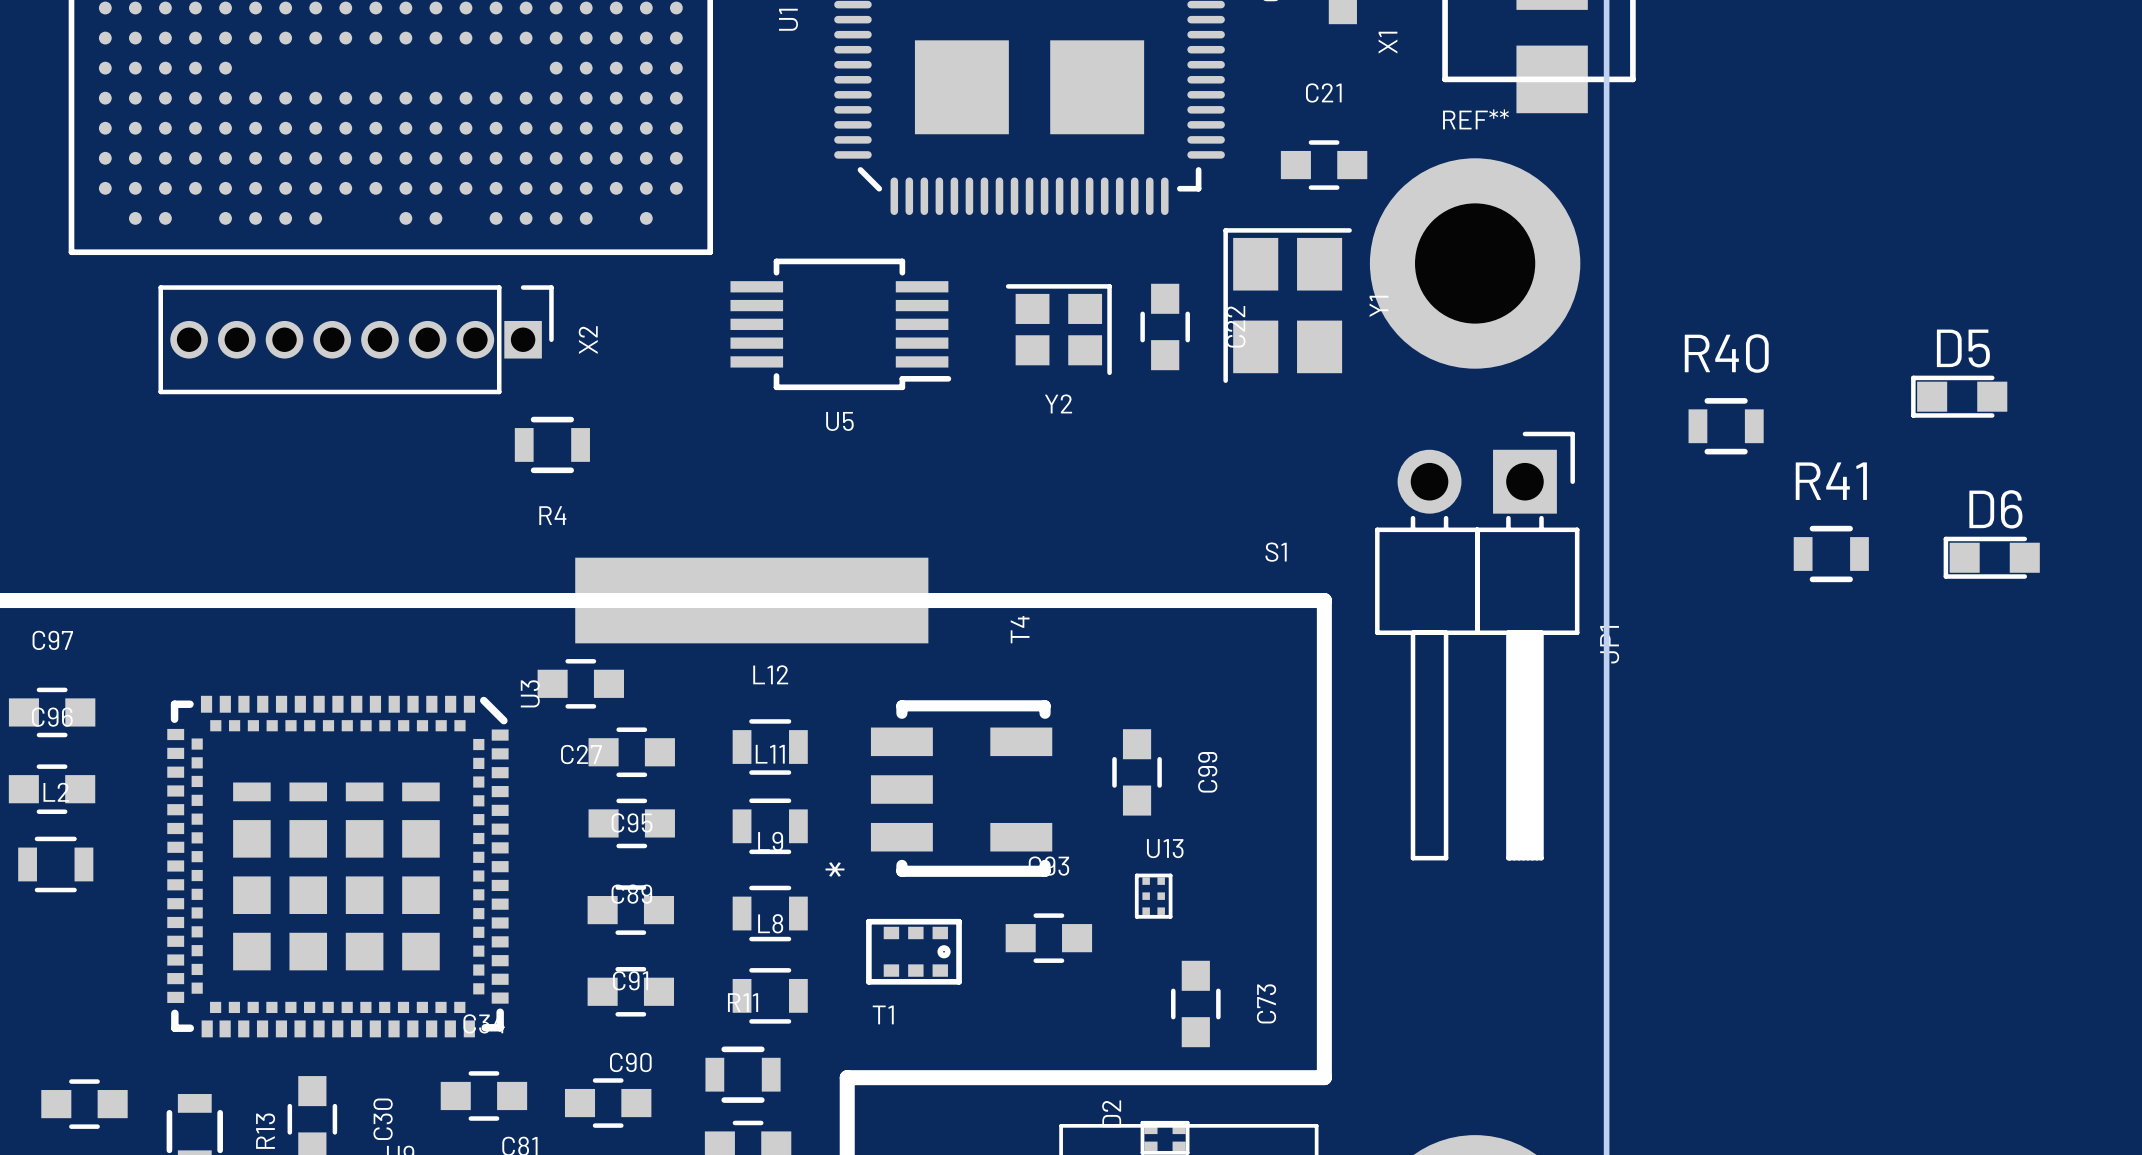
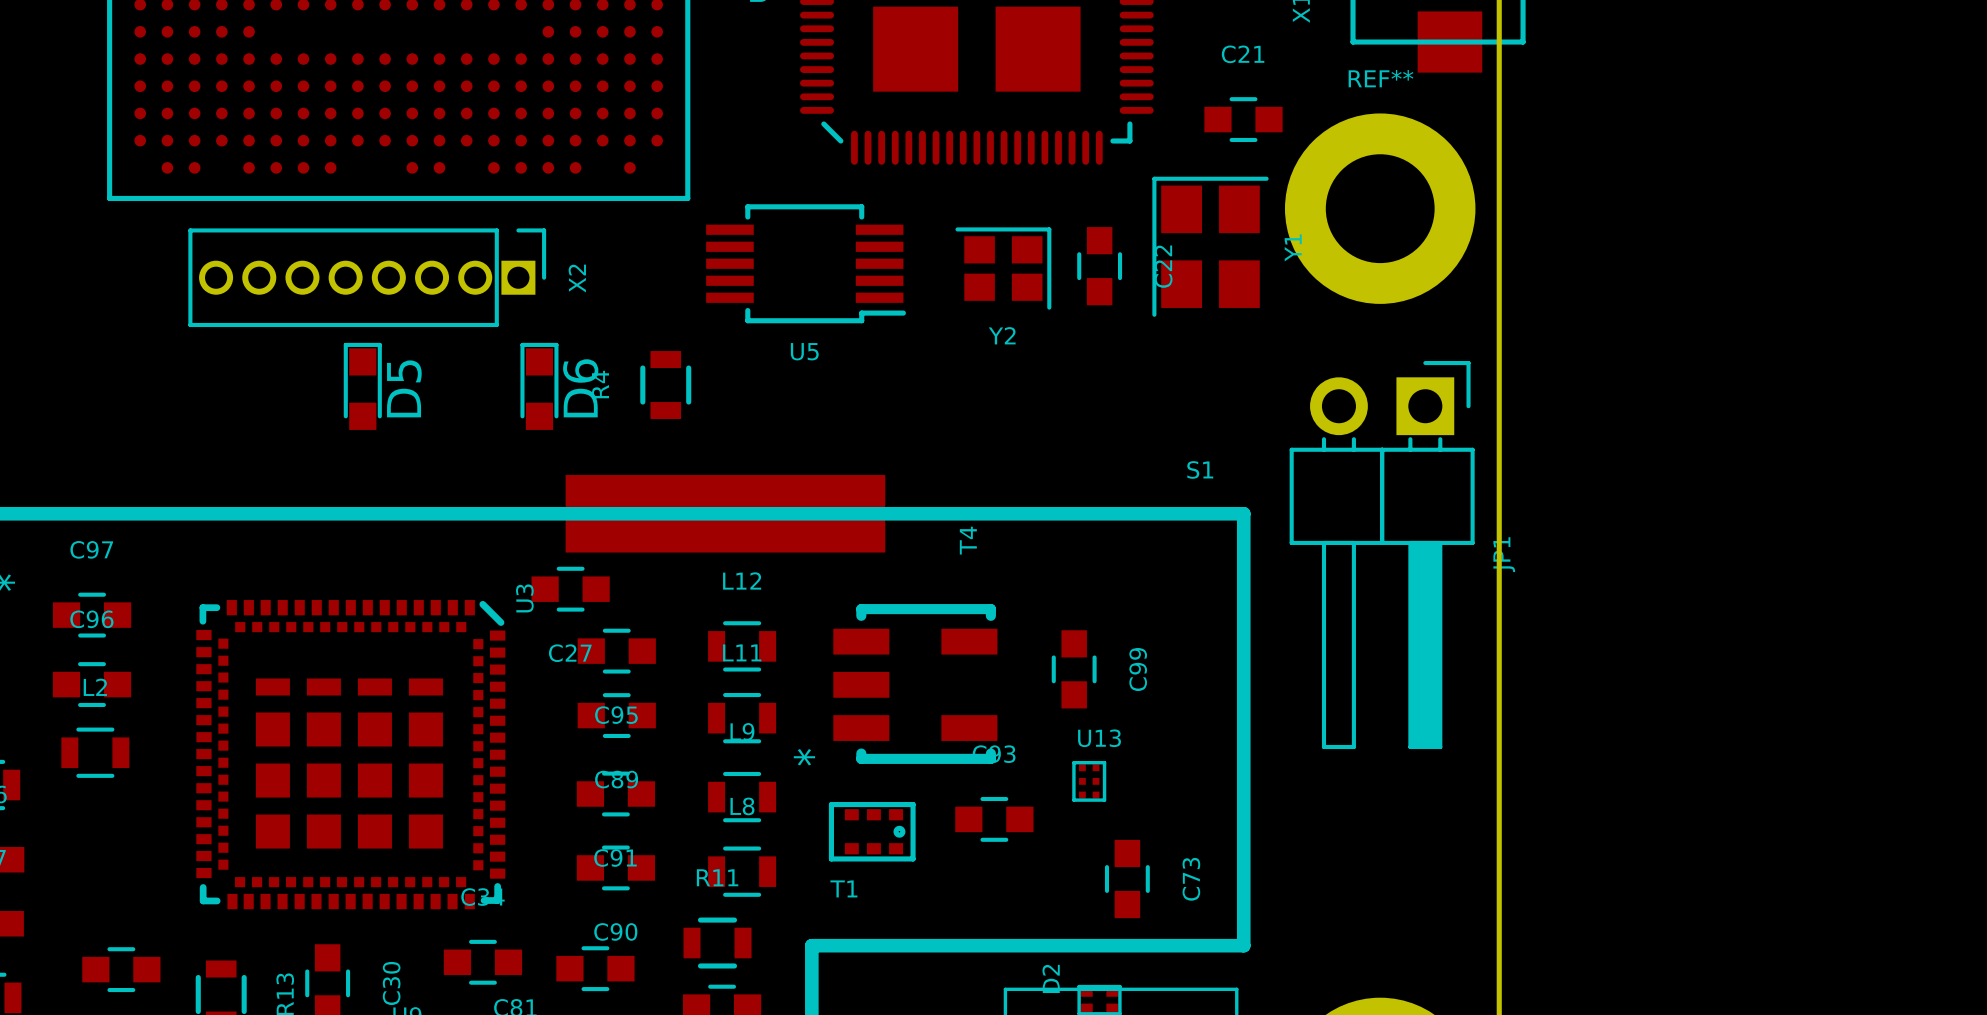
D5 rotation: 0° (1959, 396) -> 90° clockwise (362, 386)
D5 position: (1959, 396) -> (362, 386)
R40: (1726, 426) -> none
R4 rotation: 0° (552, 444) -> 90° clockwise (665, 385)
R4 position: (552, 444) -> (665, 385)
R41: (1831, 553) -> none
D6 rotation: 0° (1991, 557) -> 90° clockwise (539, 386)
D6 position: (1991, 557) -> (539, 386)

